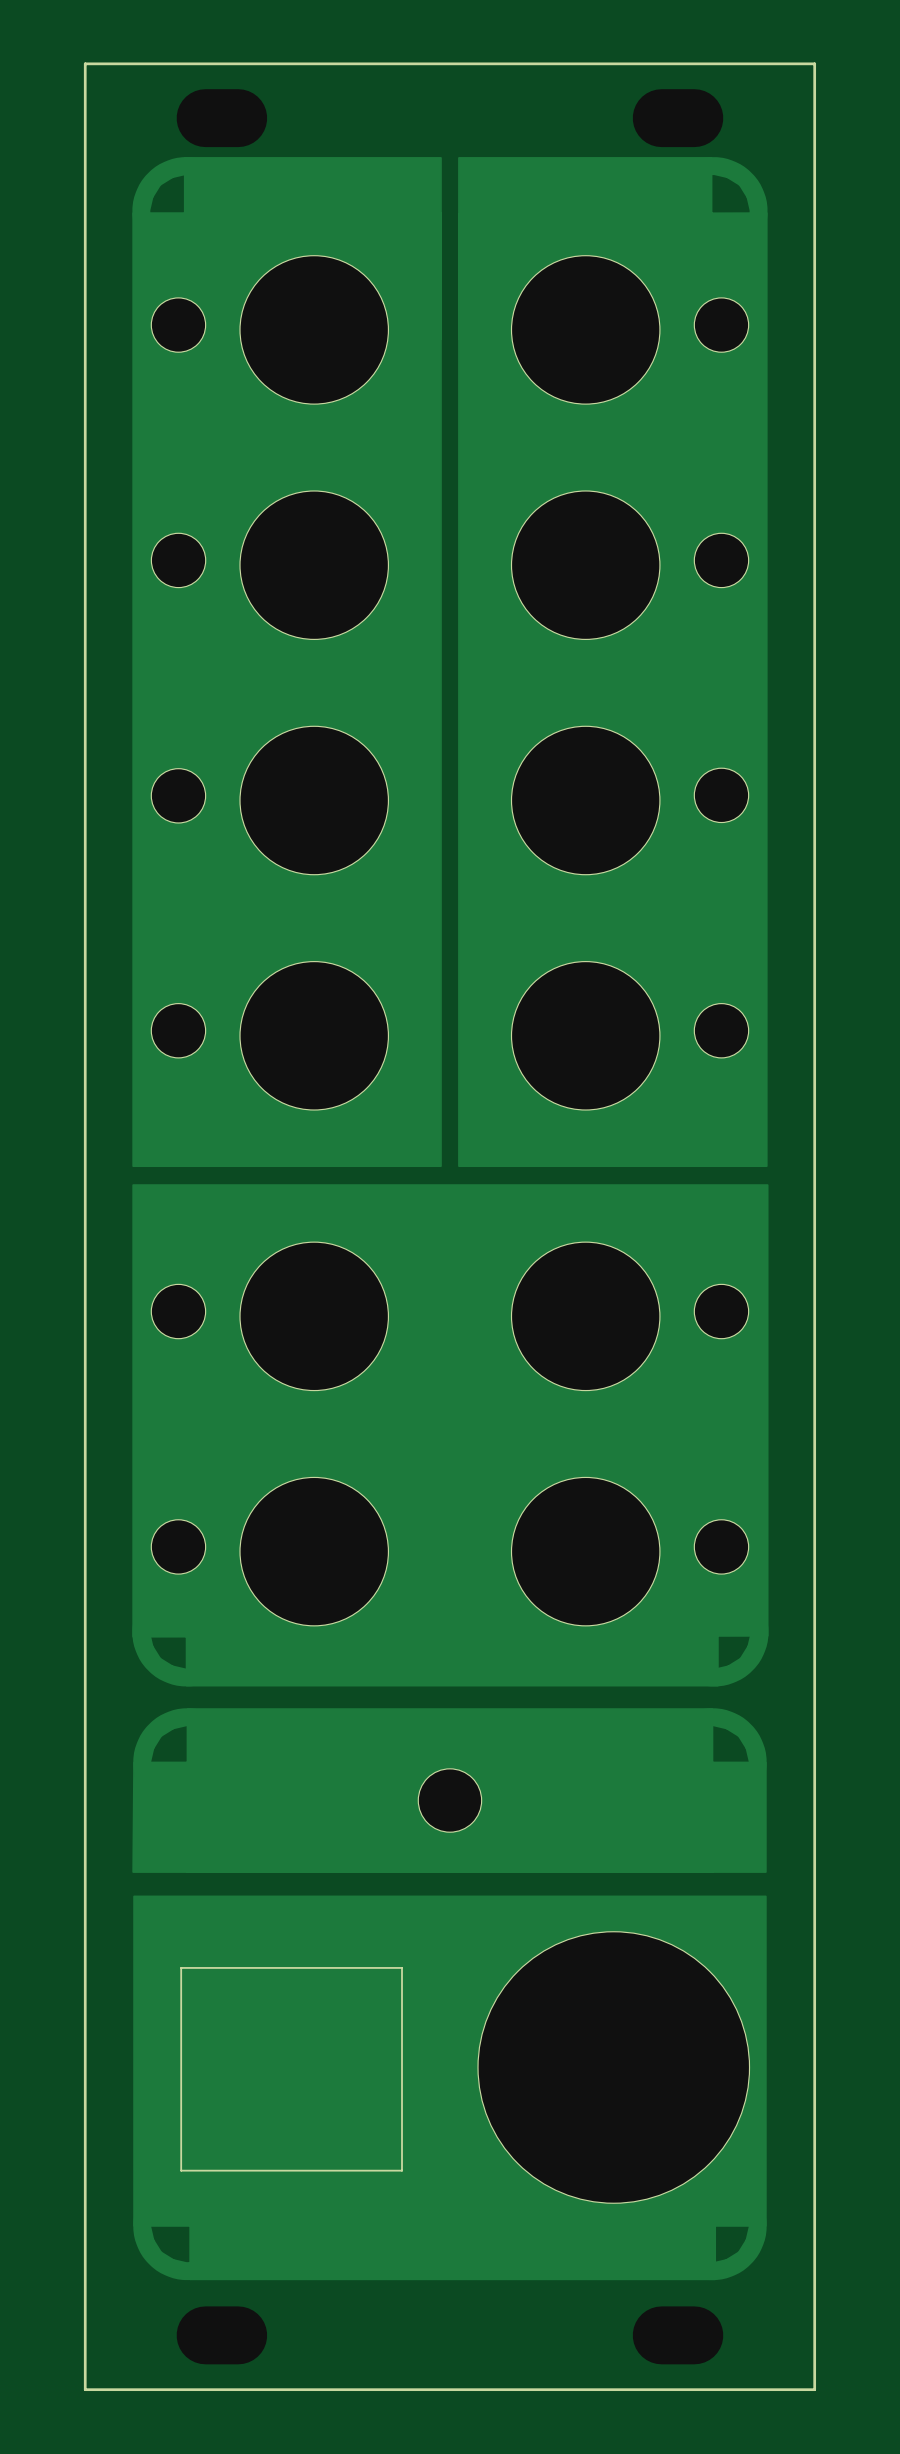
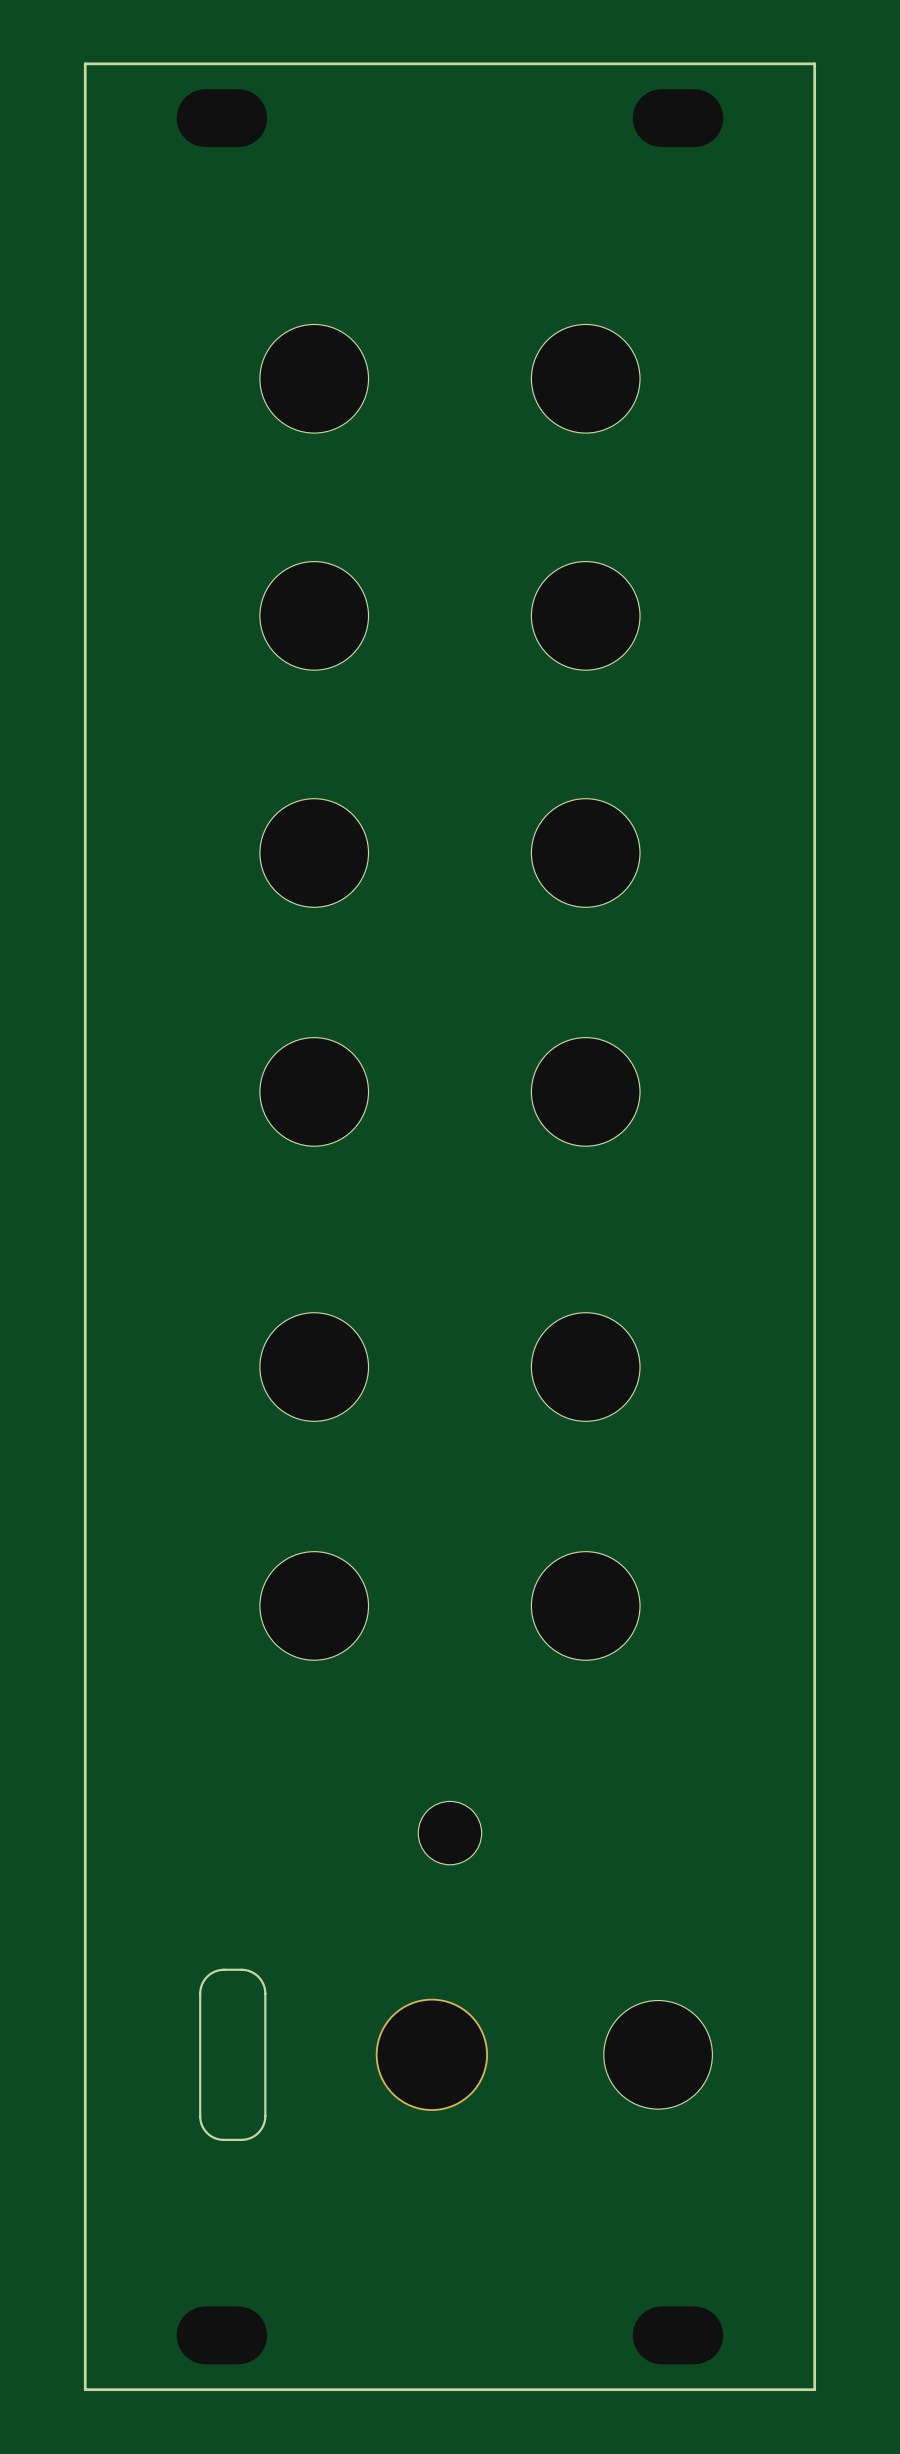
drawing: [132, 157, 769, 1687] -> none
part: (178, 325) -> none
part: (721, 325) -> none
part: (314, 329) -> none
part: (585, 329) -> none
part: none -> (314, 378)
part: none -> (585, 378)
part: (178, 560) -> none
part: (721, 560) -> none
part: (314, 565) -> none
part: (585, 565) -> none
part: none -> (314, 615)
part: none -> (585, 615)
part: (178, 795) -> none
part: (721, 795) -> none
part: (314, 800) -> none
part: (585, 800) -> none
part: none -> (314, 852)
part: none -> (585, 852)
part: (178, 1030) -> none
part: (721, 1030) -> none
part: (314, 1035) -> none
part: (585, 1035) -> none
part: none -> (314, 1091)
part: none -> (585, 1091)
part: (178, 1311) -> none
part: (721, 1311) -> none
part: (314, 1316) -> none
part: (585, 1316) -> none
part: none -> (314, 1367)
part: none -> (585, 1367)
part: (178, 1546) -> none
part: (721, 1546) -> none
part: (314, 1551) -> none
part: (585, 1551) -> none
part: none -> (314, 1605)
part: none -> (585, 1605)
drawing: [132, 1708, 767, 1873] -> none
part position: (449, 1800) -> (449, 1833)
drawing: [133, 1895, 767, 2281] -> none
board edge: (181, 1967) (181, 2170) (402, 2170) (402, 1967) (181, 1967) -> none
drawing: none -> [199, 1968, 267, 2141]
part: none -> (431, 2054)
part: none -> (658, 2054)
part: (613, 2067) -> none

